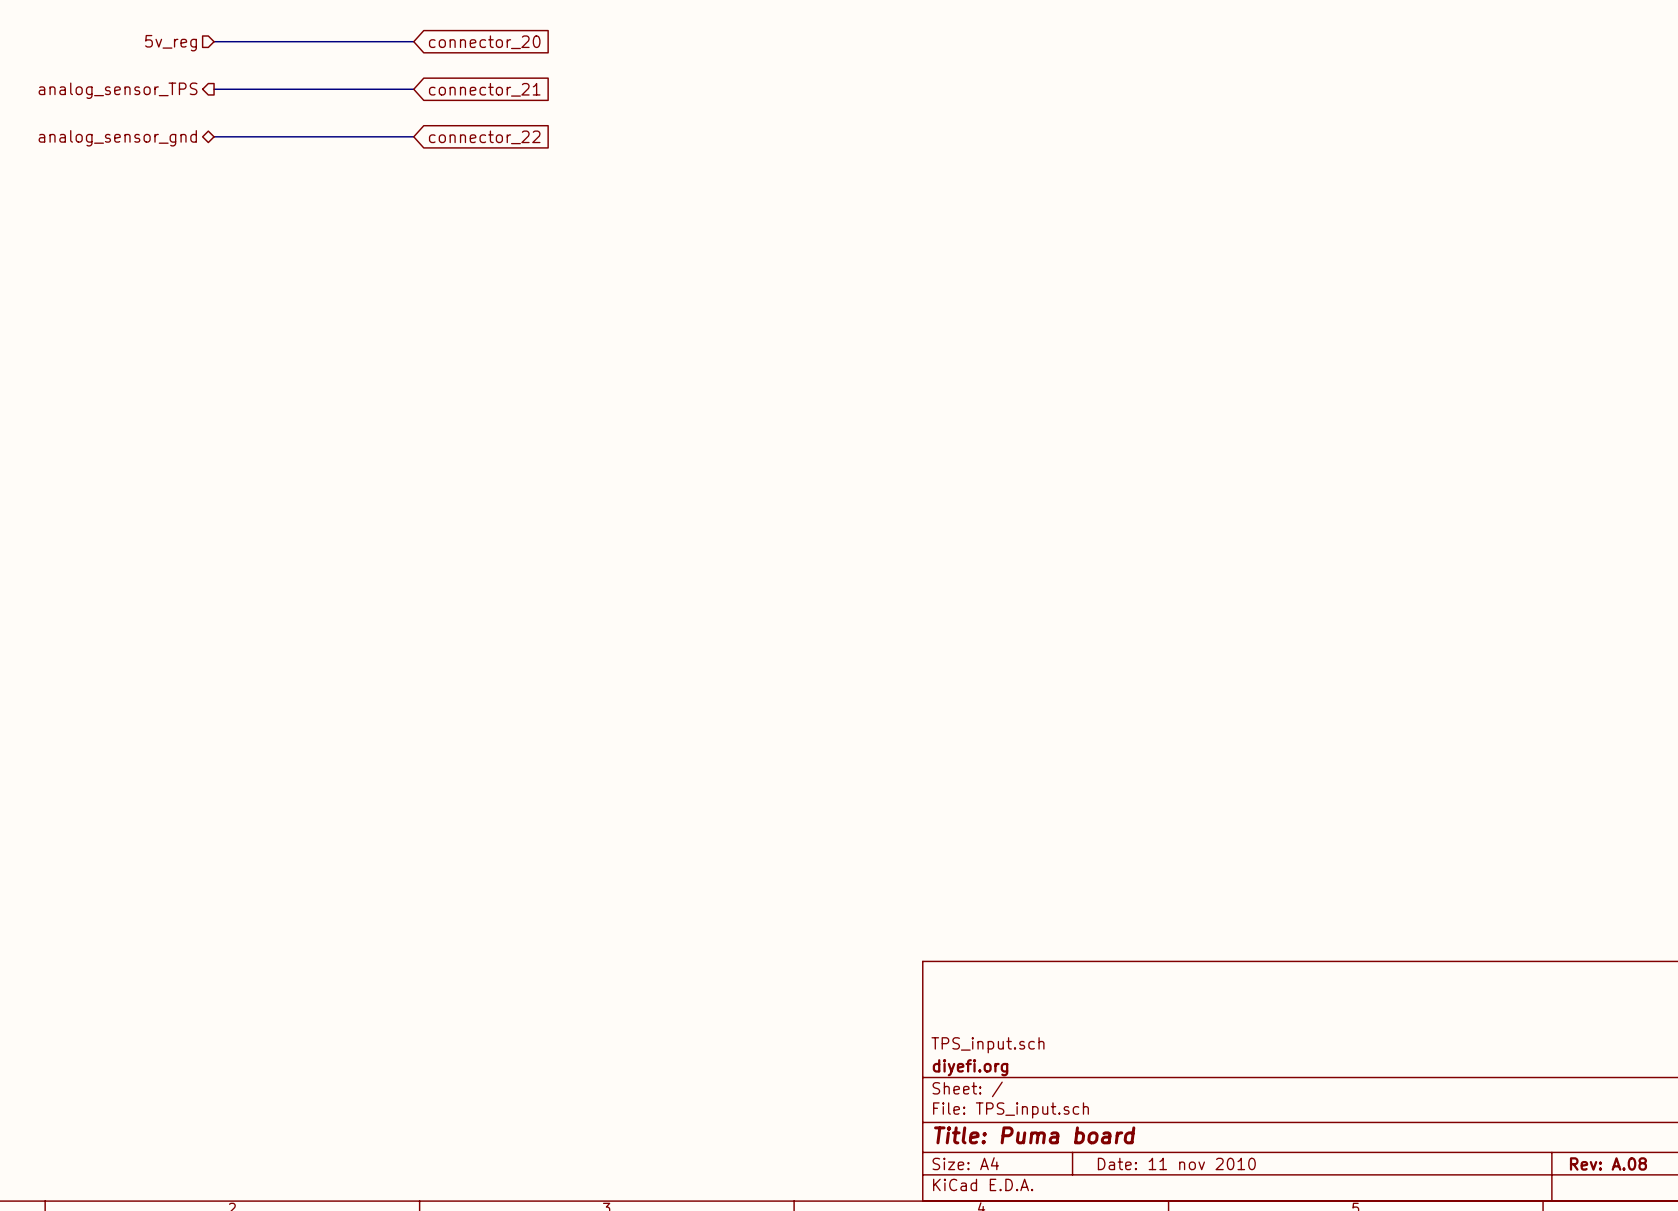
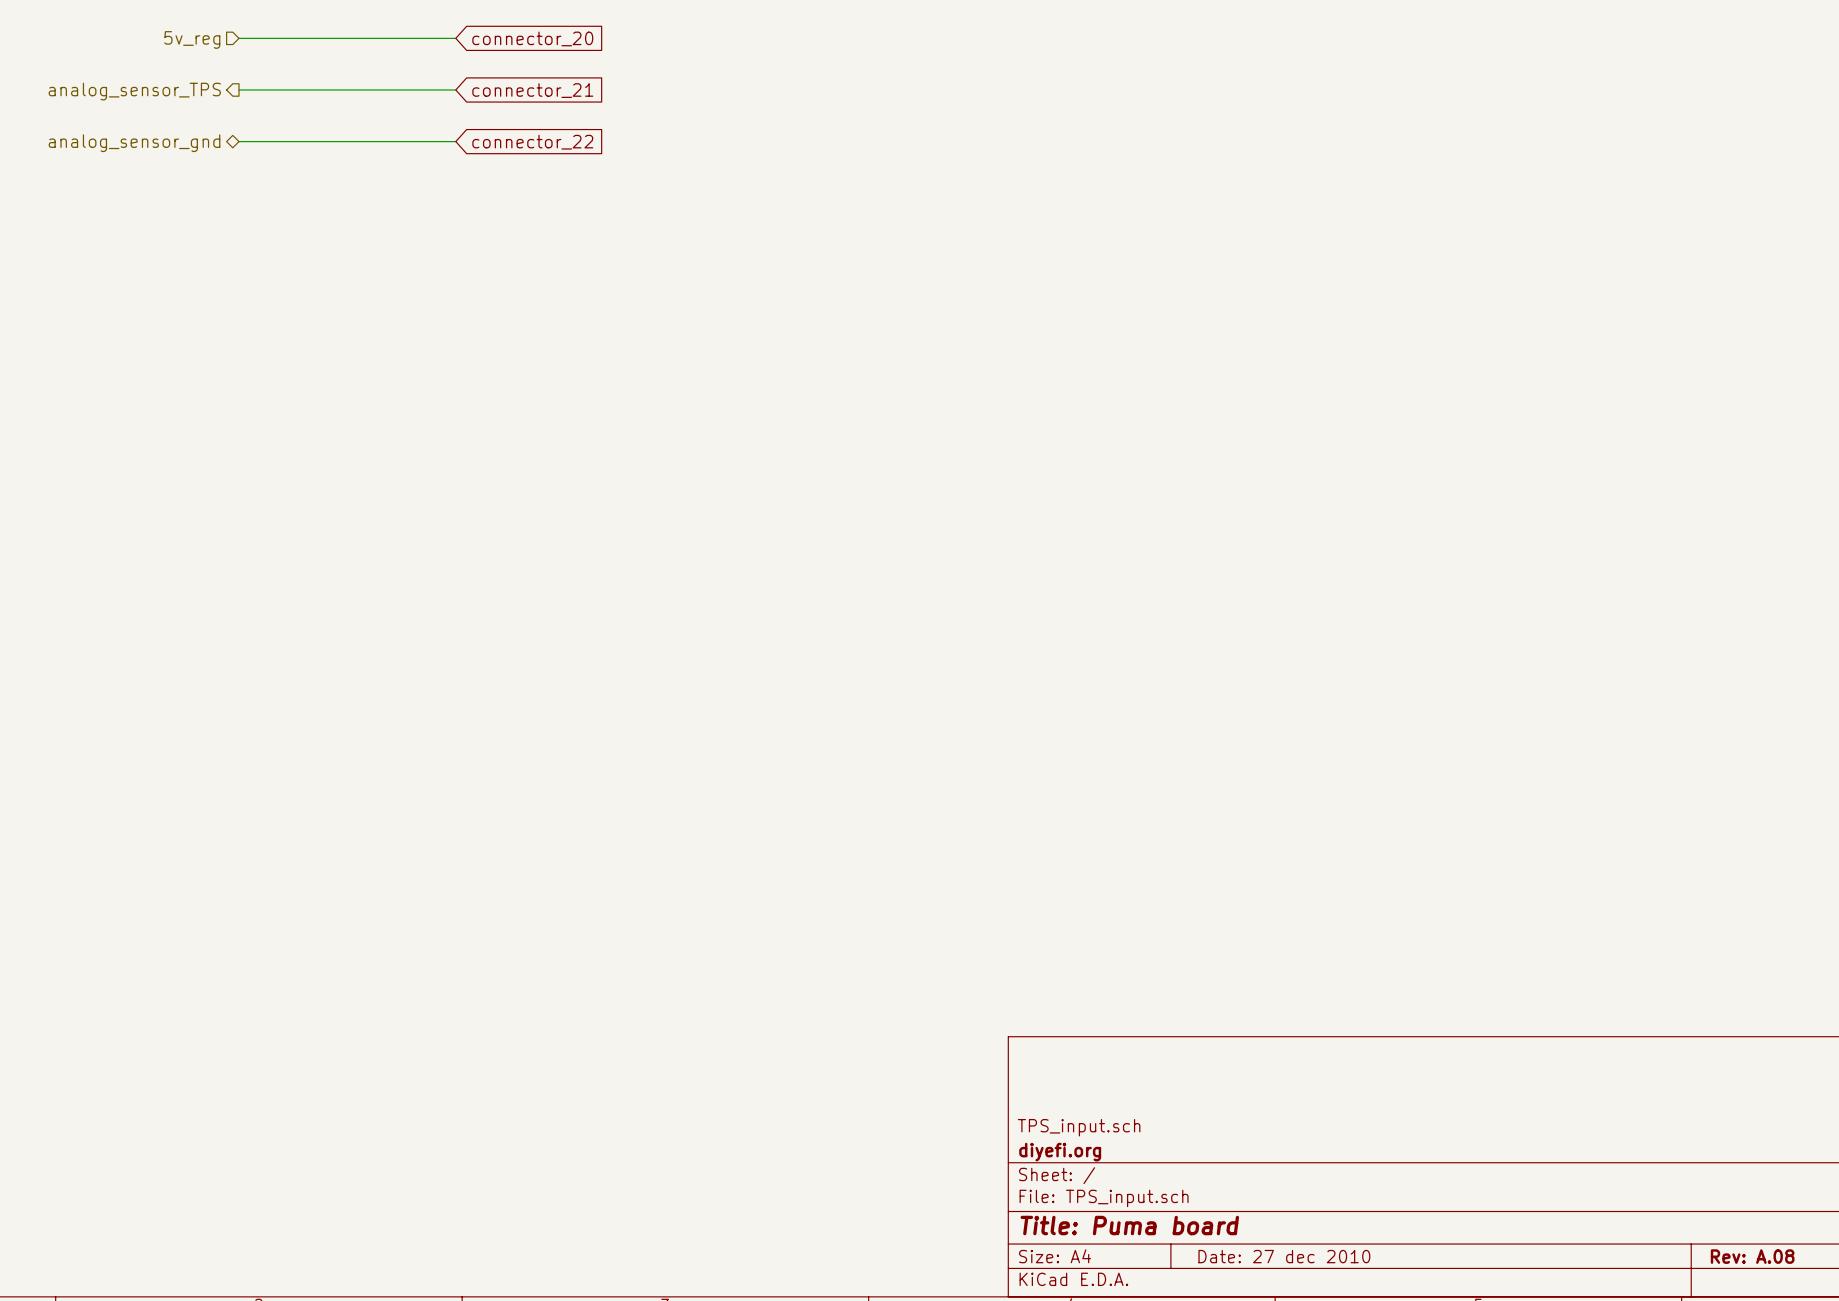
title block: Date: 11 nov 2010 (1176, 1163) -> Date: 27 dec 2010 (1284, 1256)

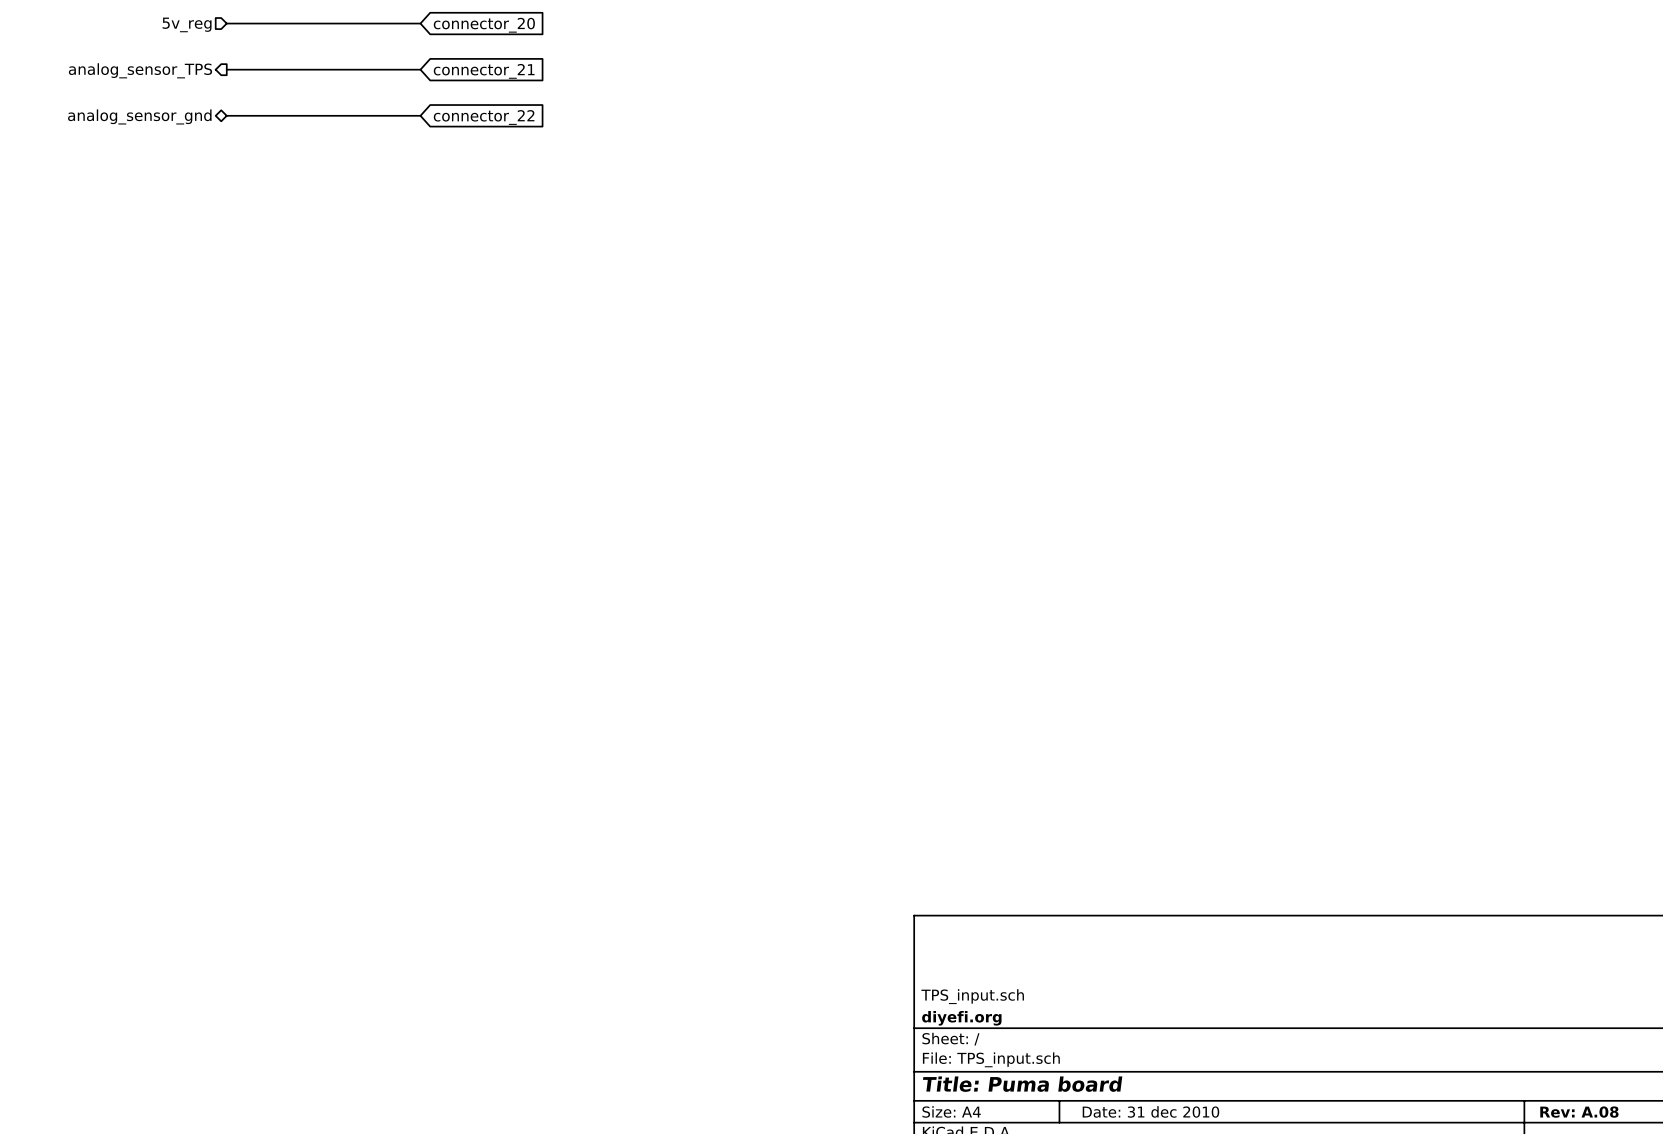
title block: Date: 27 dec 2010 (1284, 1256) -> Date: 31 dec 2010 (1150, 1111)

